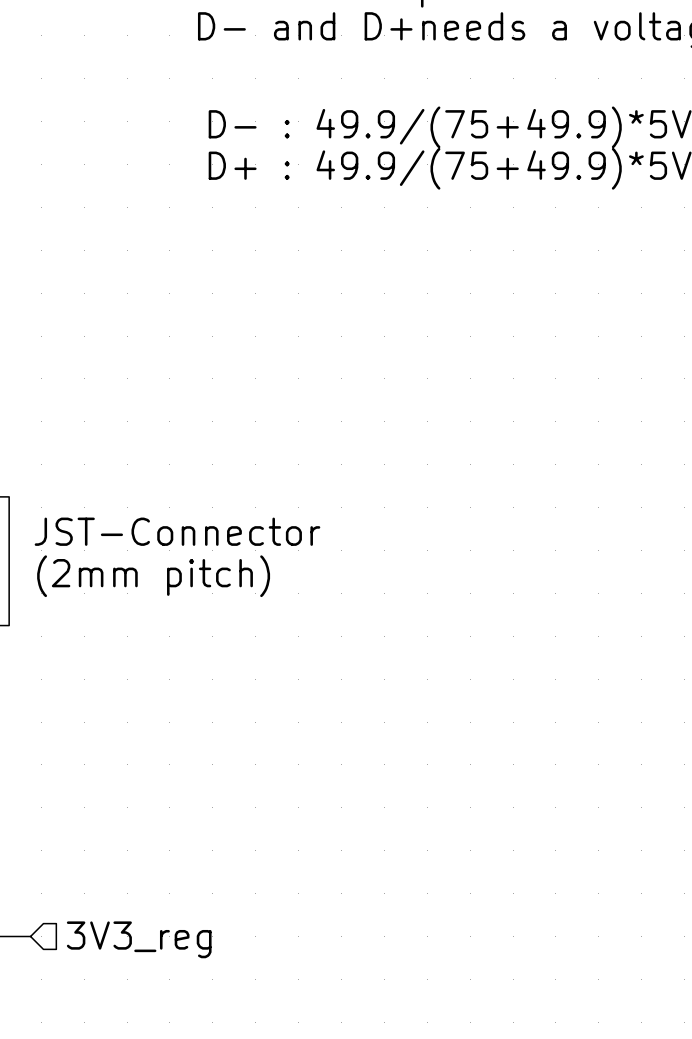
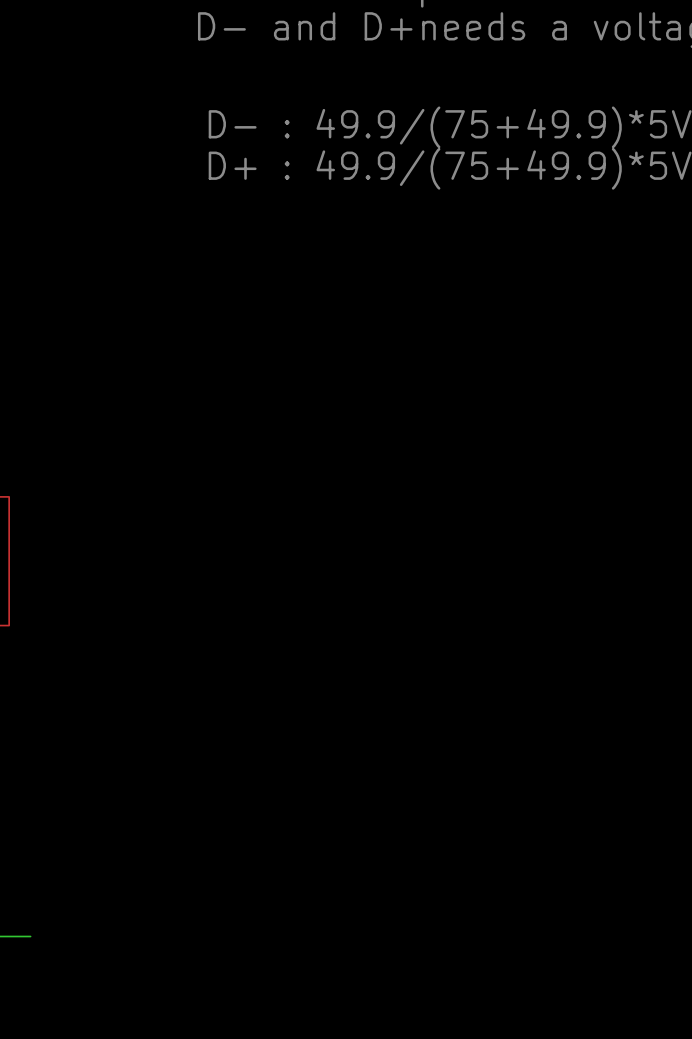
text: JST-Connector (177, 531) -> none
text: (2mm pitch) (153, 576) -> none
hierarchical label: 3V3_reg (139, 939) -> none

